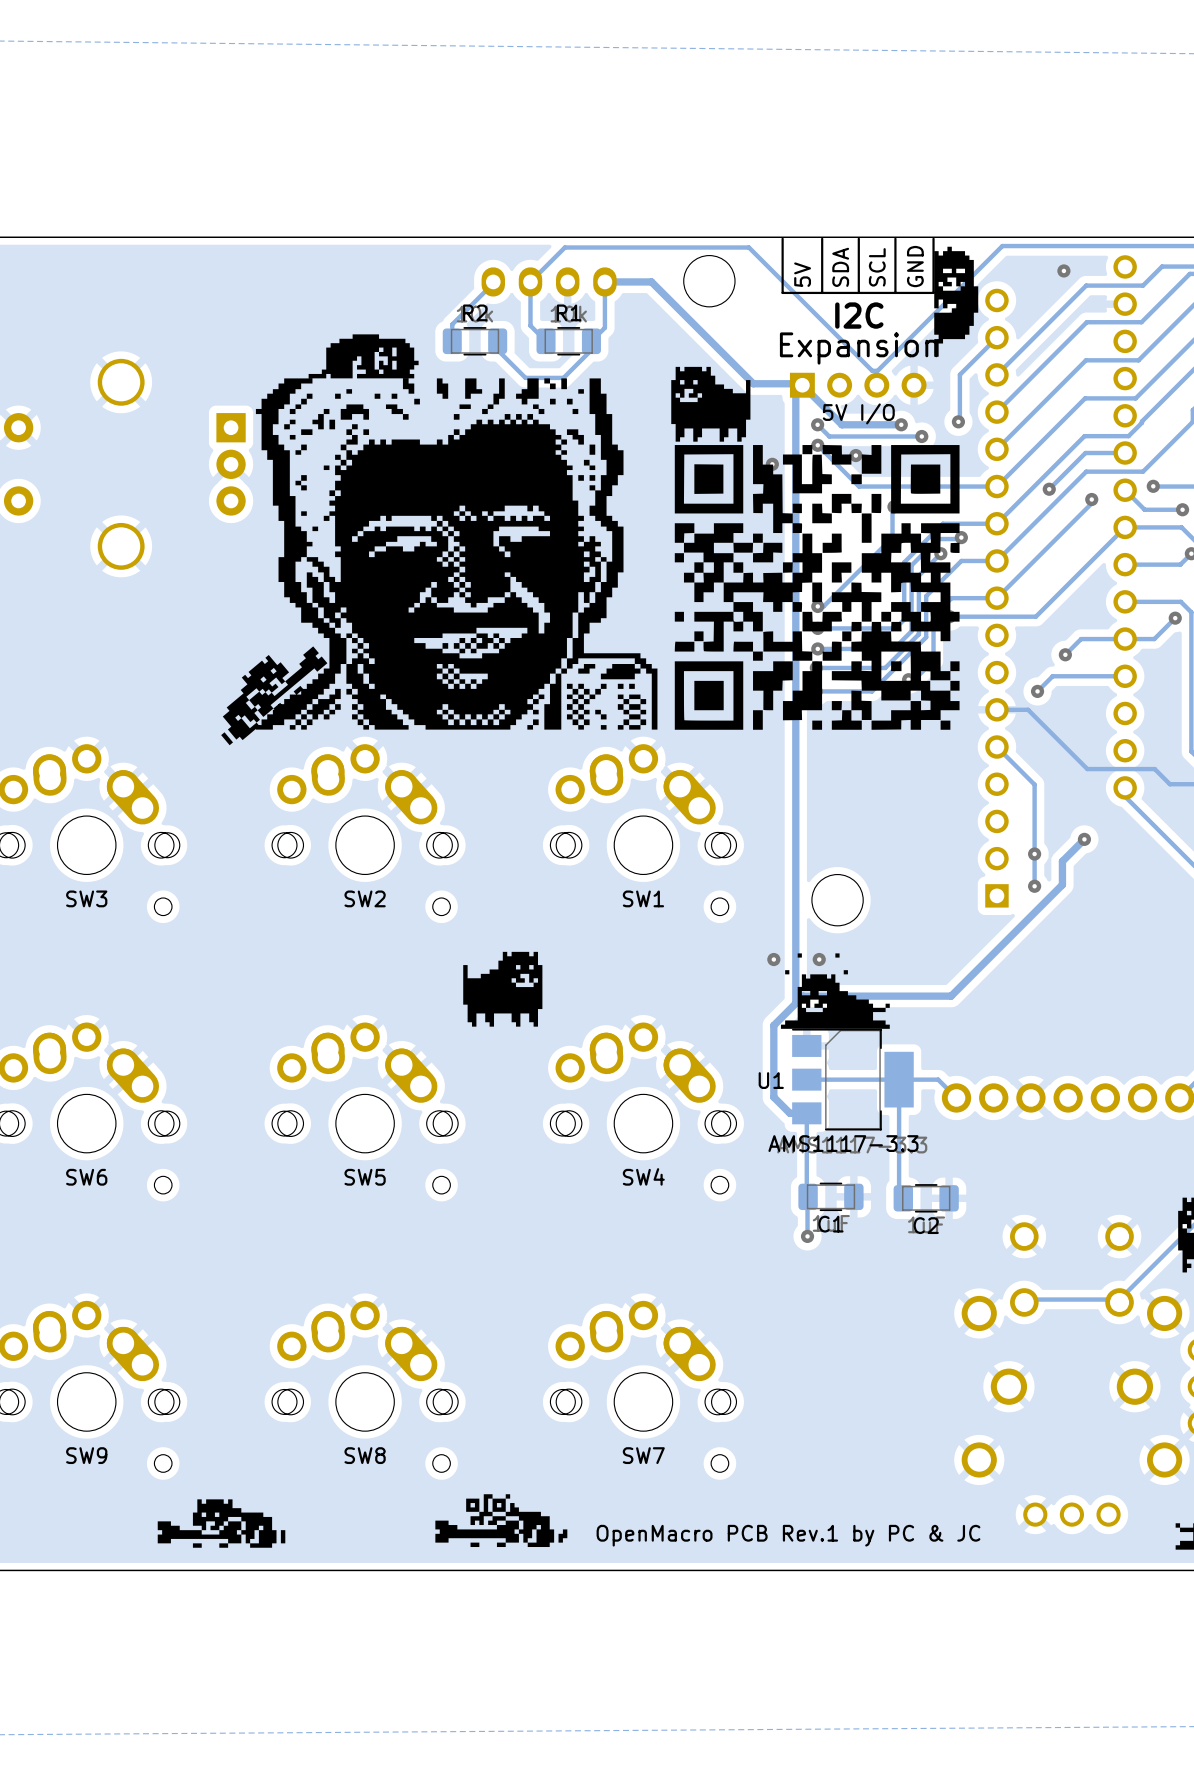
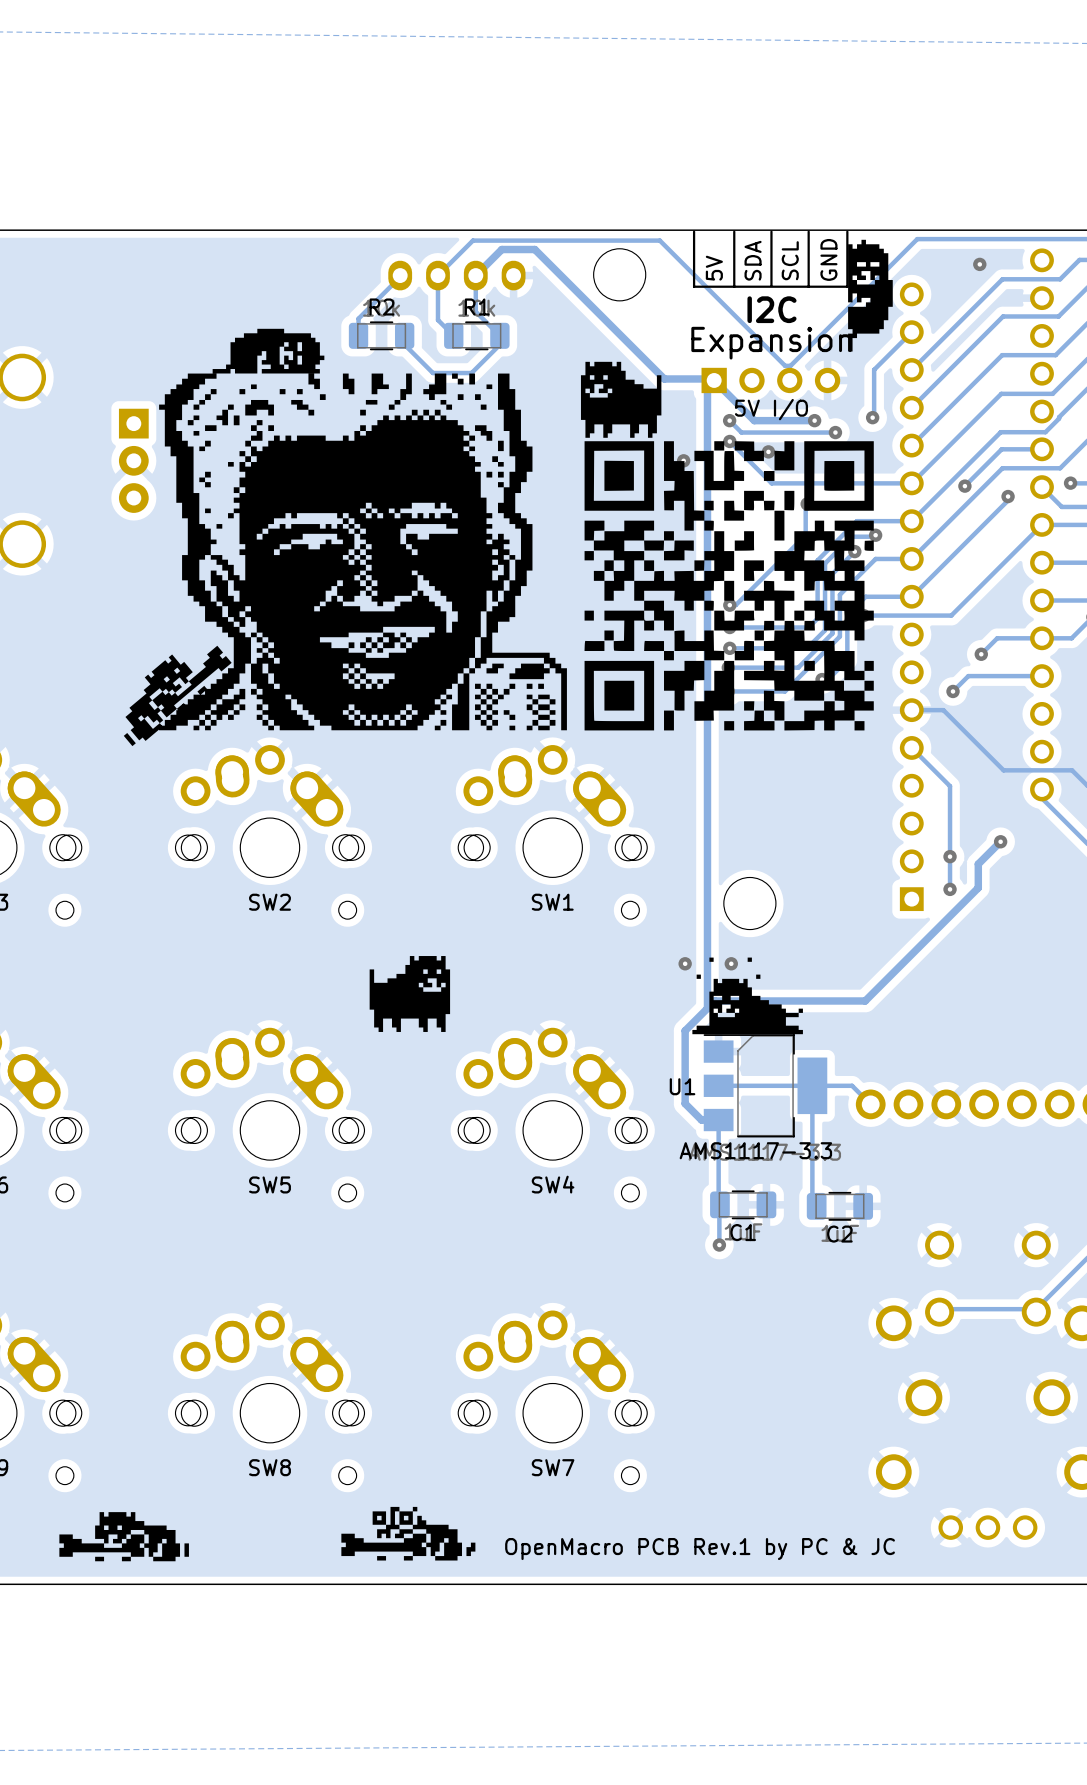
track: (651, 281) (604, 281) (604, 327) (591, 341) -> (560, 275) (534, 249) (501, 249) (475, 275) (475, 311) (499, 335)

